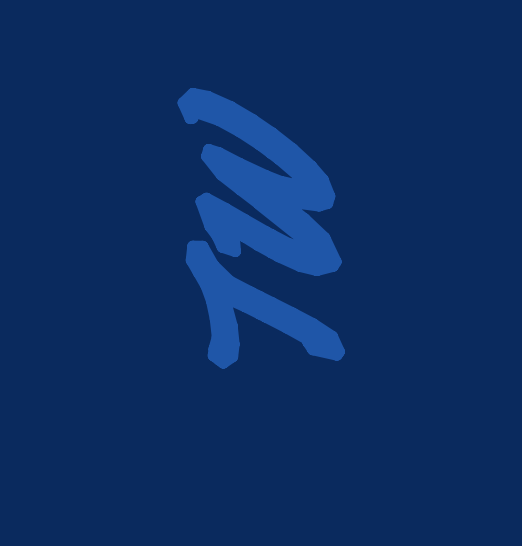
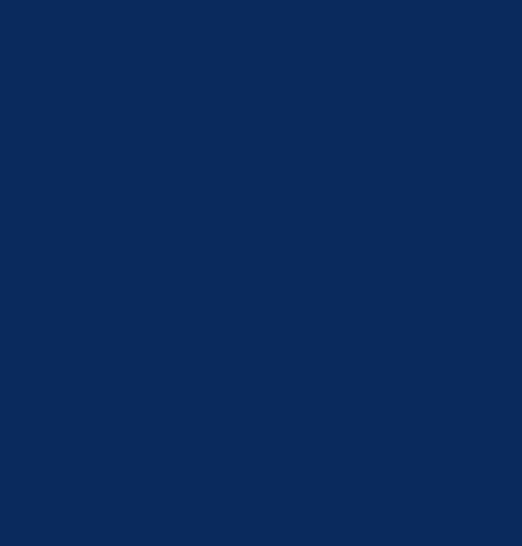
track: (192, 105) (197, 102) (217, 109) (252, 129) (287, 153) (307, 173) (312, 183) (316, 186) (313, 190) (321, 196) (278, 189) (275, 193) (218, 159) (234, 175) (300, 224) (313, 237) (326, 258) (315, 260) (292, 254) (269, 243) (253, 232) (228, 223) (224, 215) (213, 210) (227, 242) -> none
track: (280, 181) (208, 149) (206, 156) (221, 174) (257, 203) -> none
track: (282, 181) (304, 186) (297, 174) (259, 144) (218, 120) (197, 112) (190, 118) (183, 102) (192, 93) (207, 96) (230, 106) (273, 133) (311, 166) (323, 179) (329, 196) (327, 203) (319, 205) (298, 203) (278, 196) (324, 237) (336, 261) (333, 266) (316, 270) (300, 266) (278, 256) (231, 229) (233, 233) (235, 251) (222, 247) (210, 226) (201, 201) (206, 198) (288, 243) (314, 251) (302, 239) (259, 204) -> none
track: (192, 246) (202, 246) (213, 265) (229, 281) (313, 323) (332, 336) (339, 351) (336, 355) (312, 349) (308, 339) (224, 297) (232, 325) (234, 344) (232, 356) (223, 363) (213, 355) (217, 337) (215, 318) (206, 285) (191, 260) (192, 246) -> none
track: (326, 336) (329, 346) (318, 340) (319, 337) (306, 328) (290, 319) (228, 292) (200, 255) (212, 278) (218, 298) (224, 329) (225, 343) (223, 351) -> none

